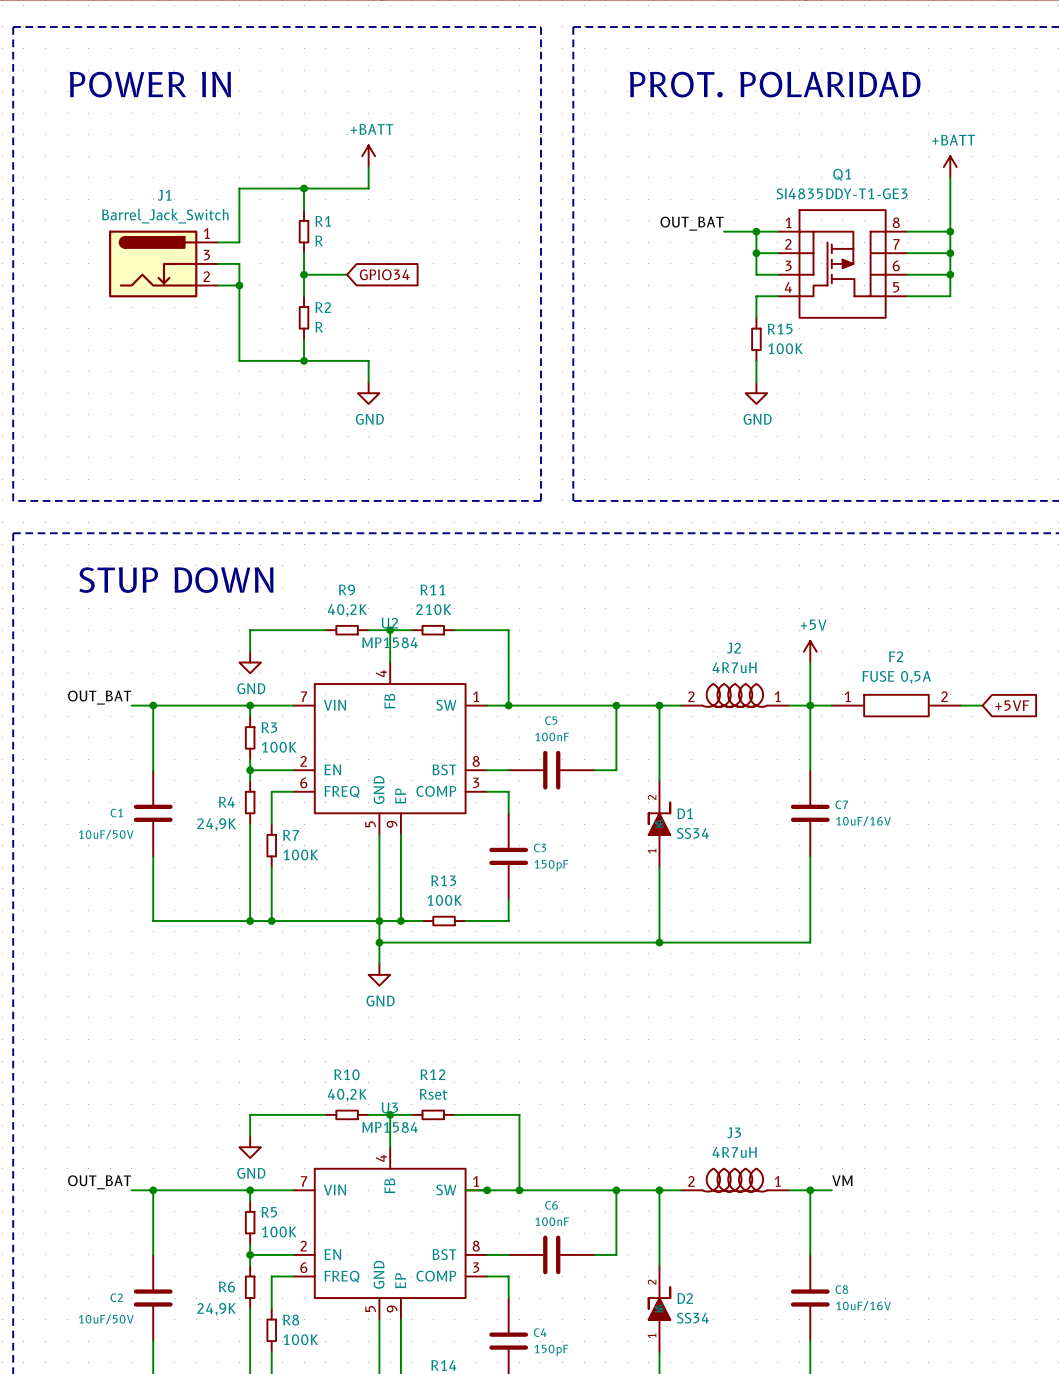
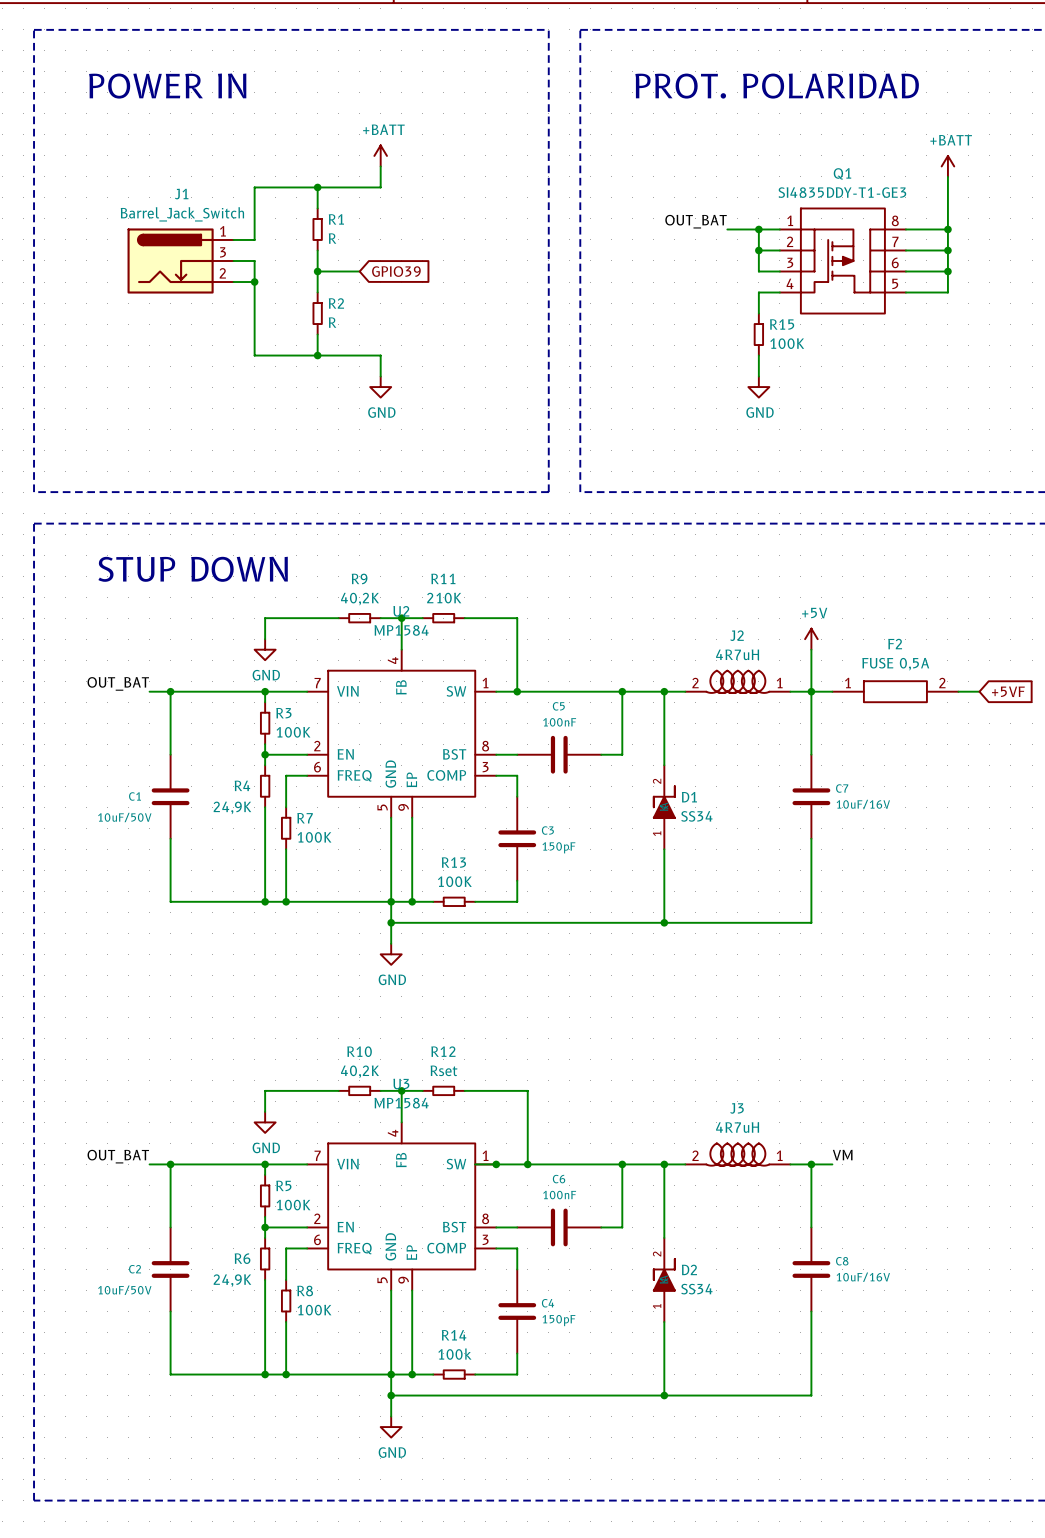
global label: GPIO34 (384, 274) -> GPIO39 (396, 271)

